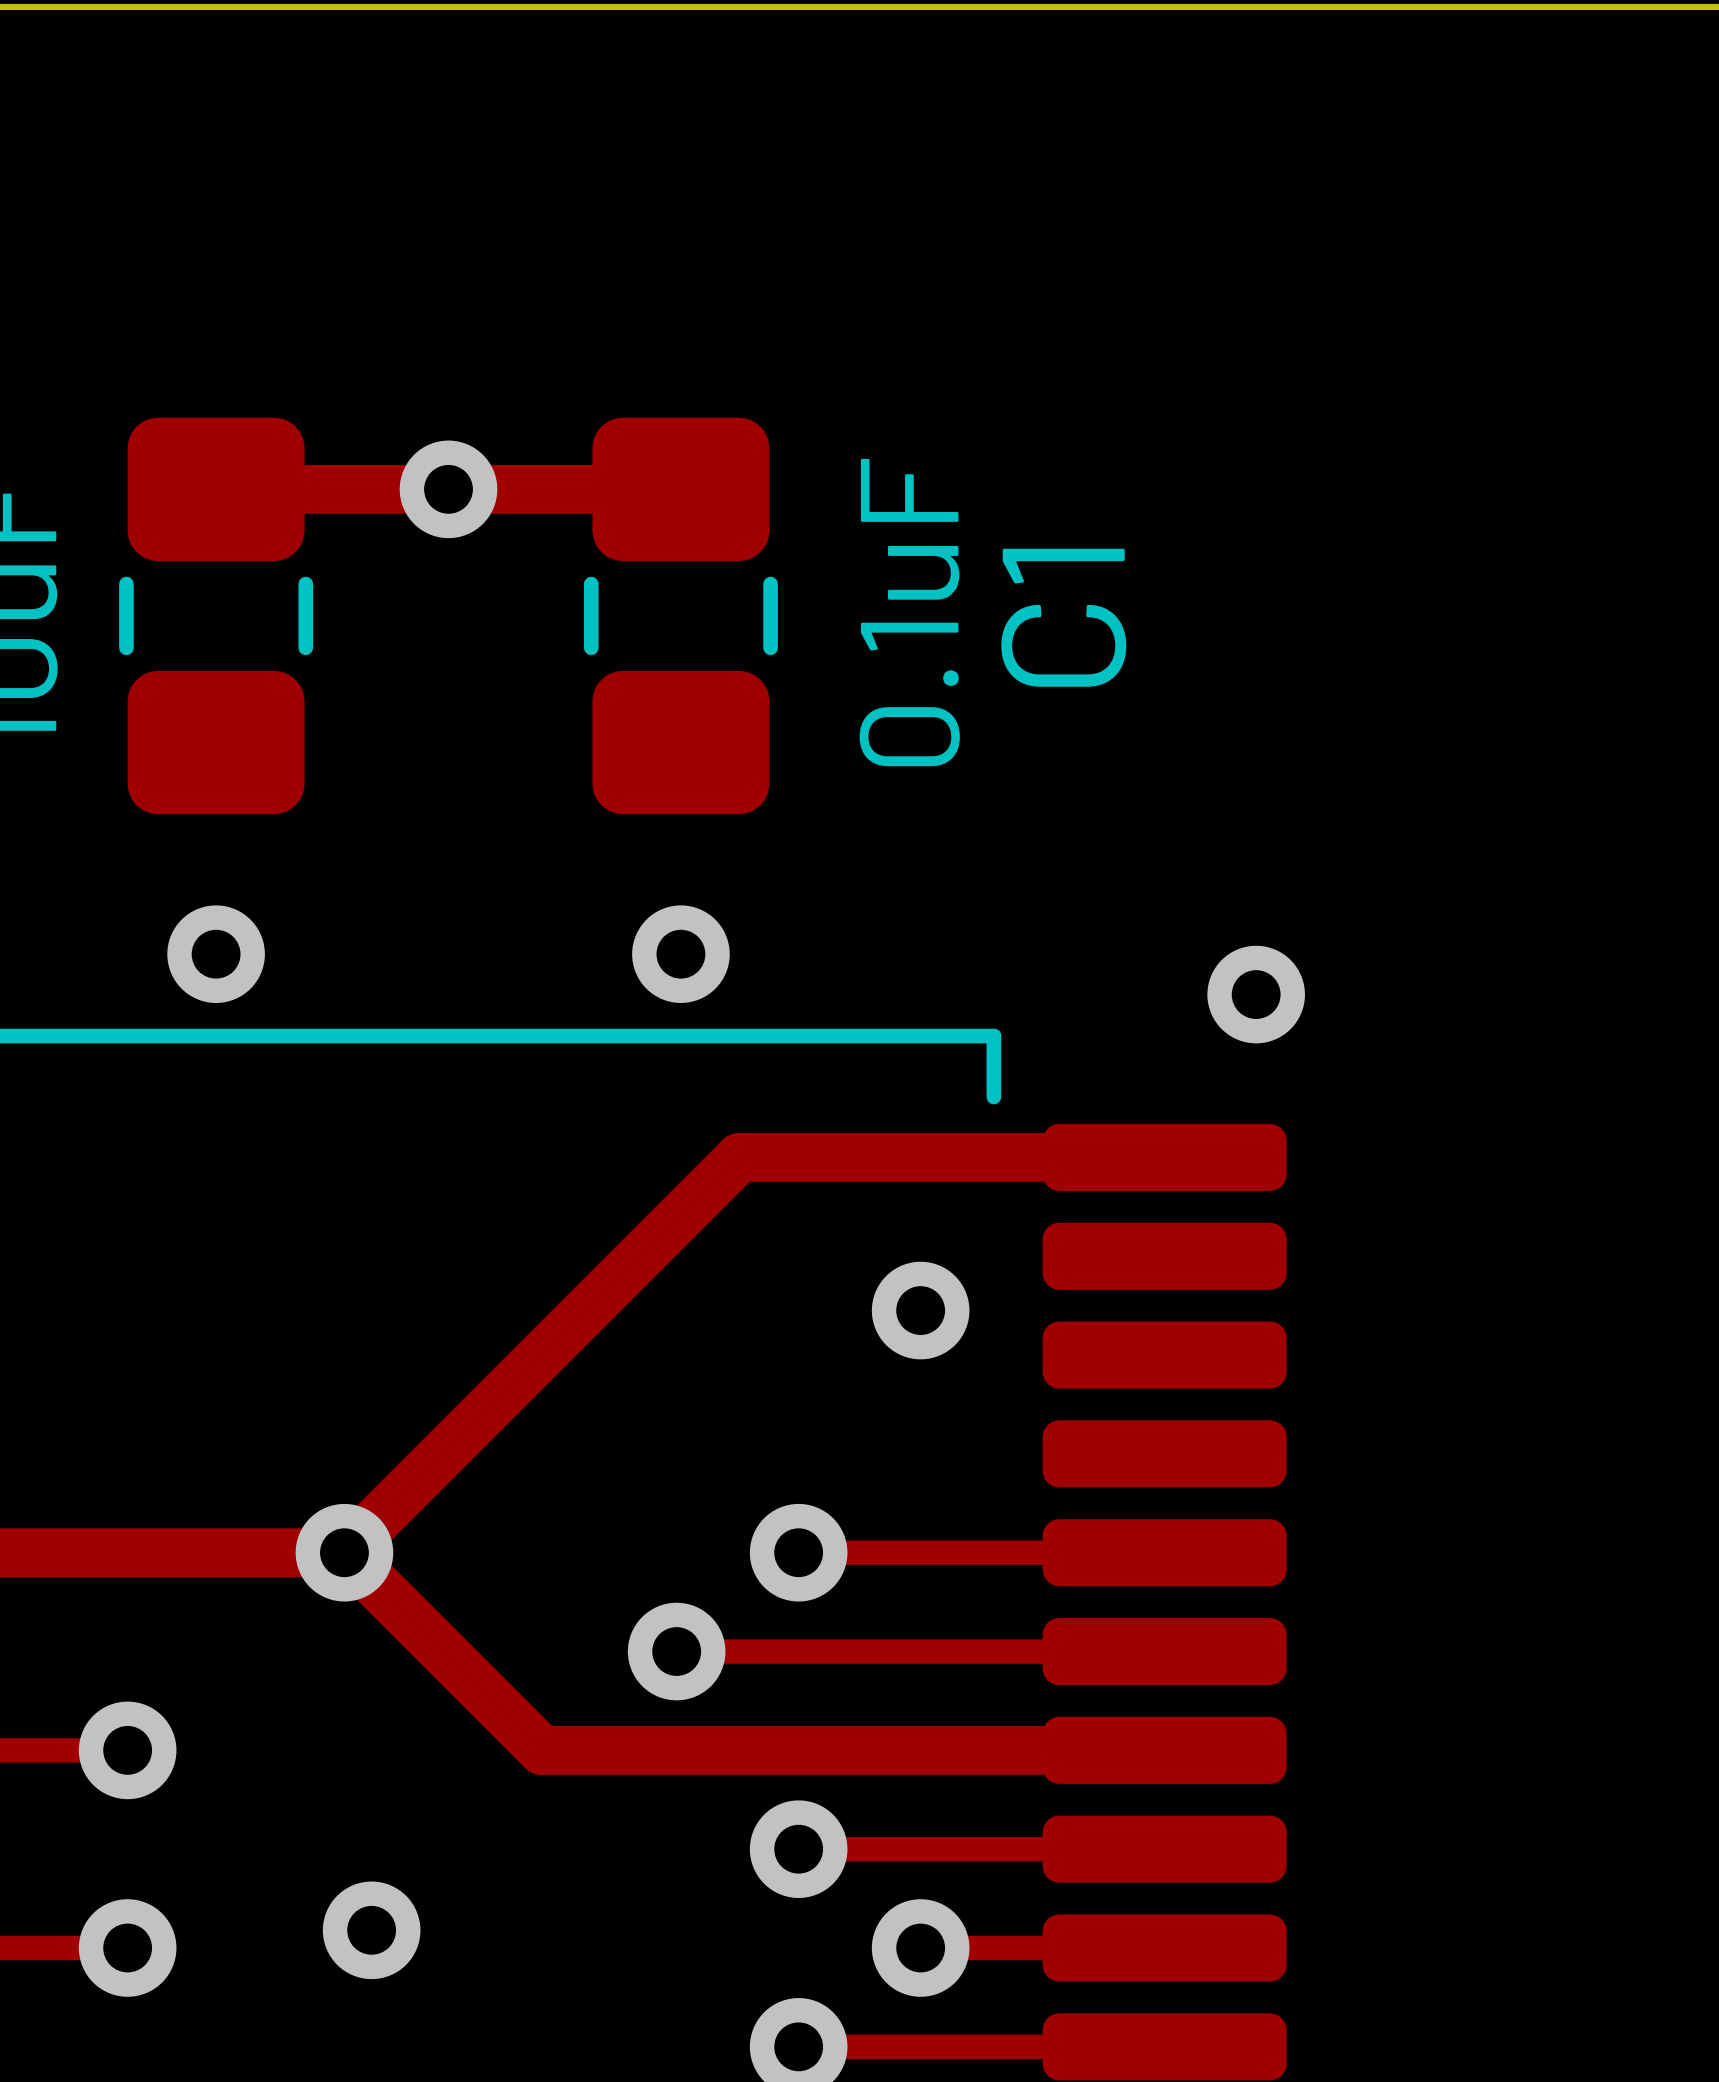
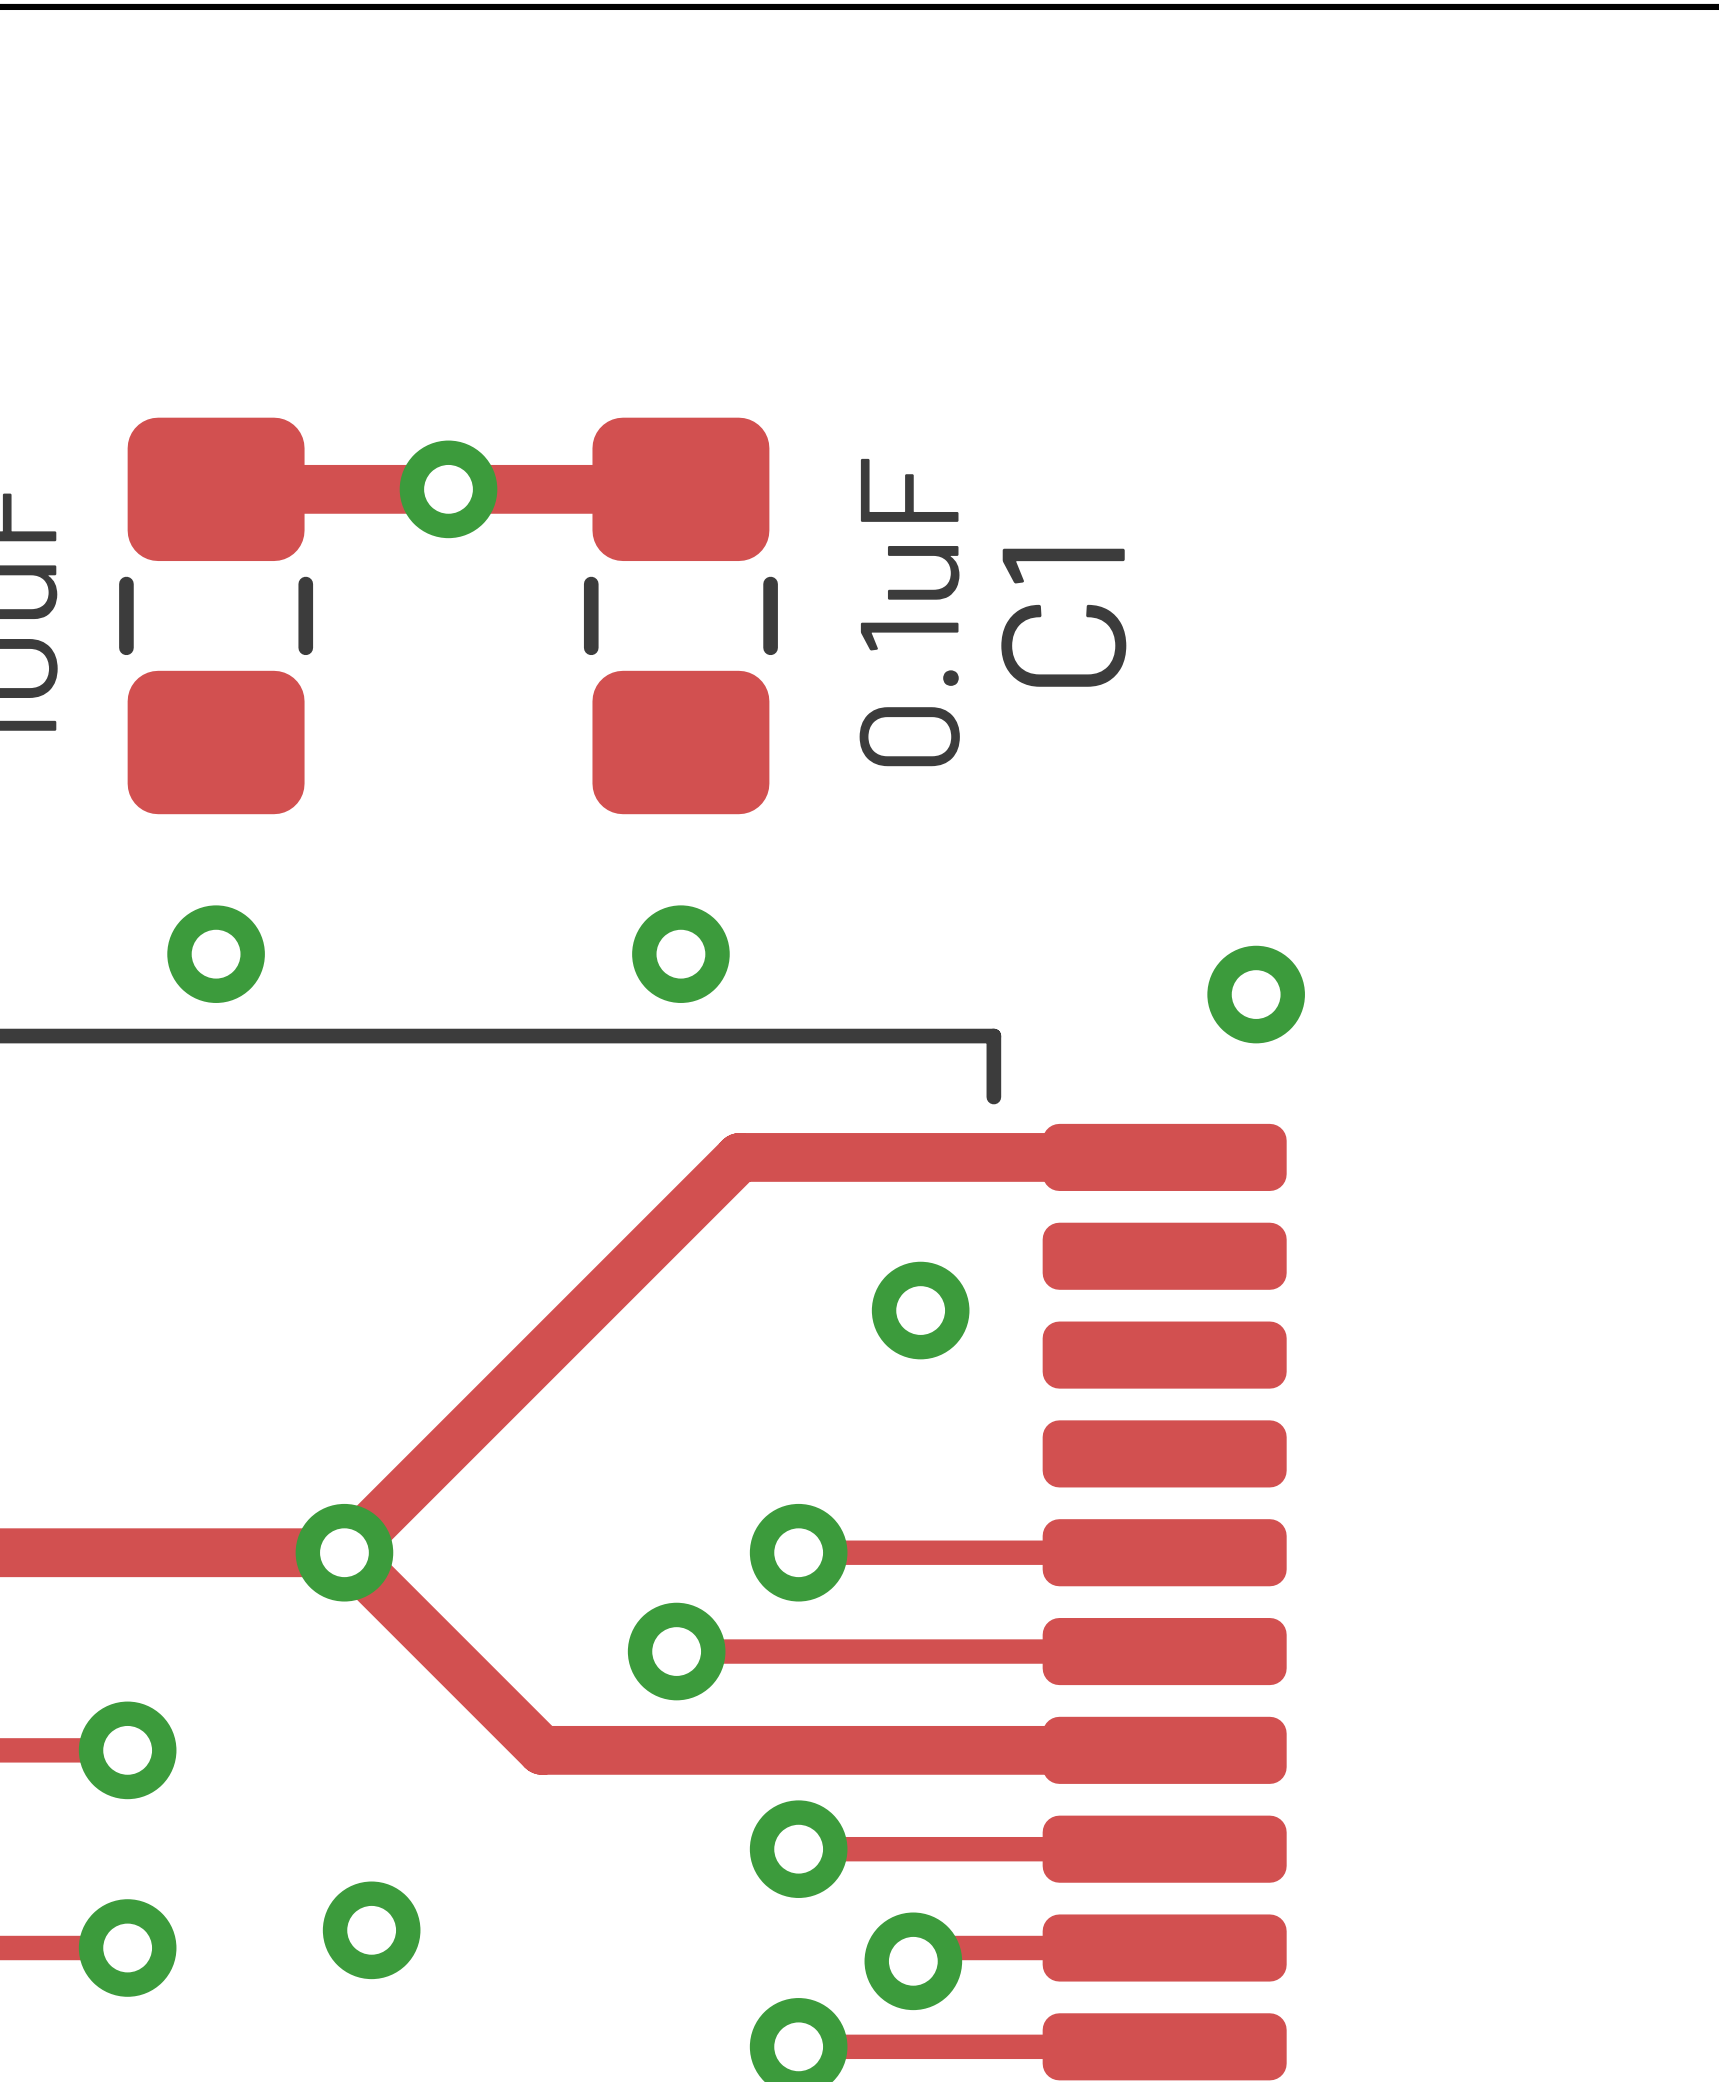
via position: (920, 1948) -> (913, 1961)

